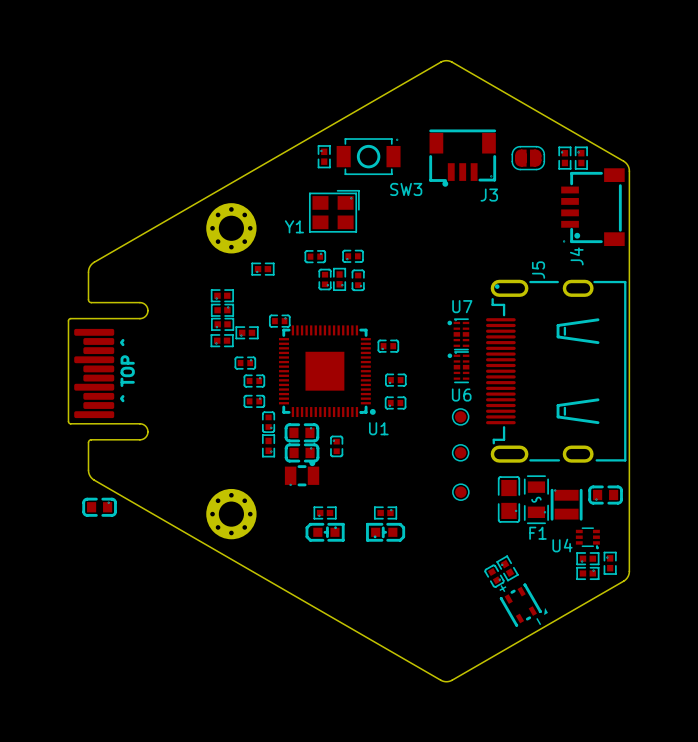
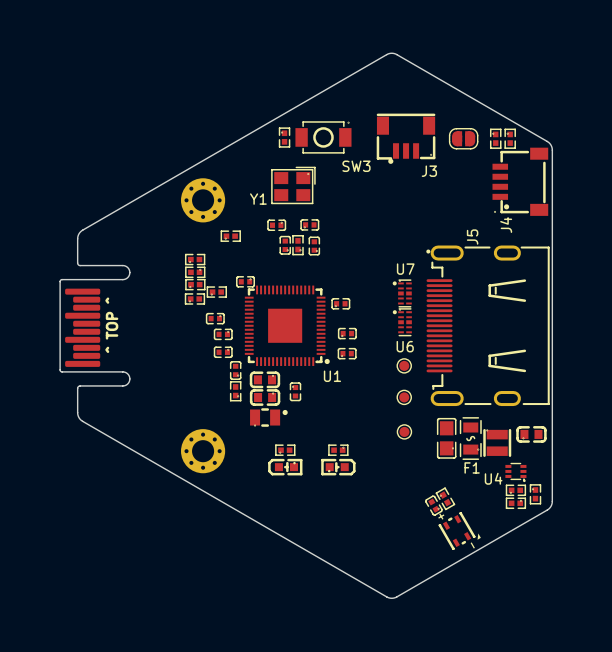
J5 footprint: [486, 279, 627, 463] -> [426, 245, 550, 407]
part footprint: [284, 460, 320, 487] -> [250, 408, 288, 427]
part: (99, 507) -> none

